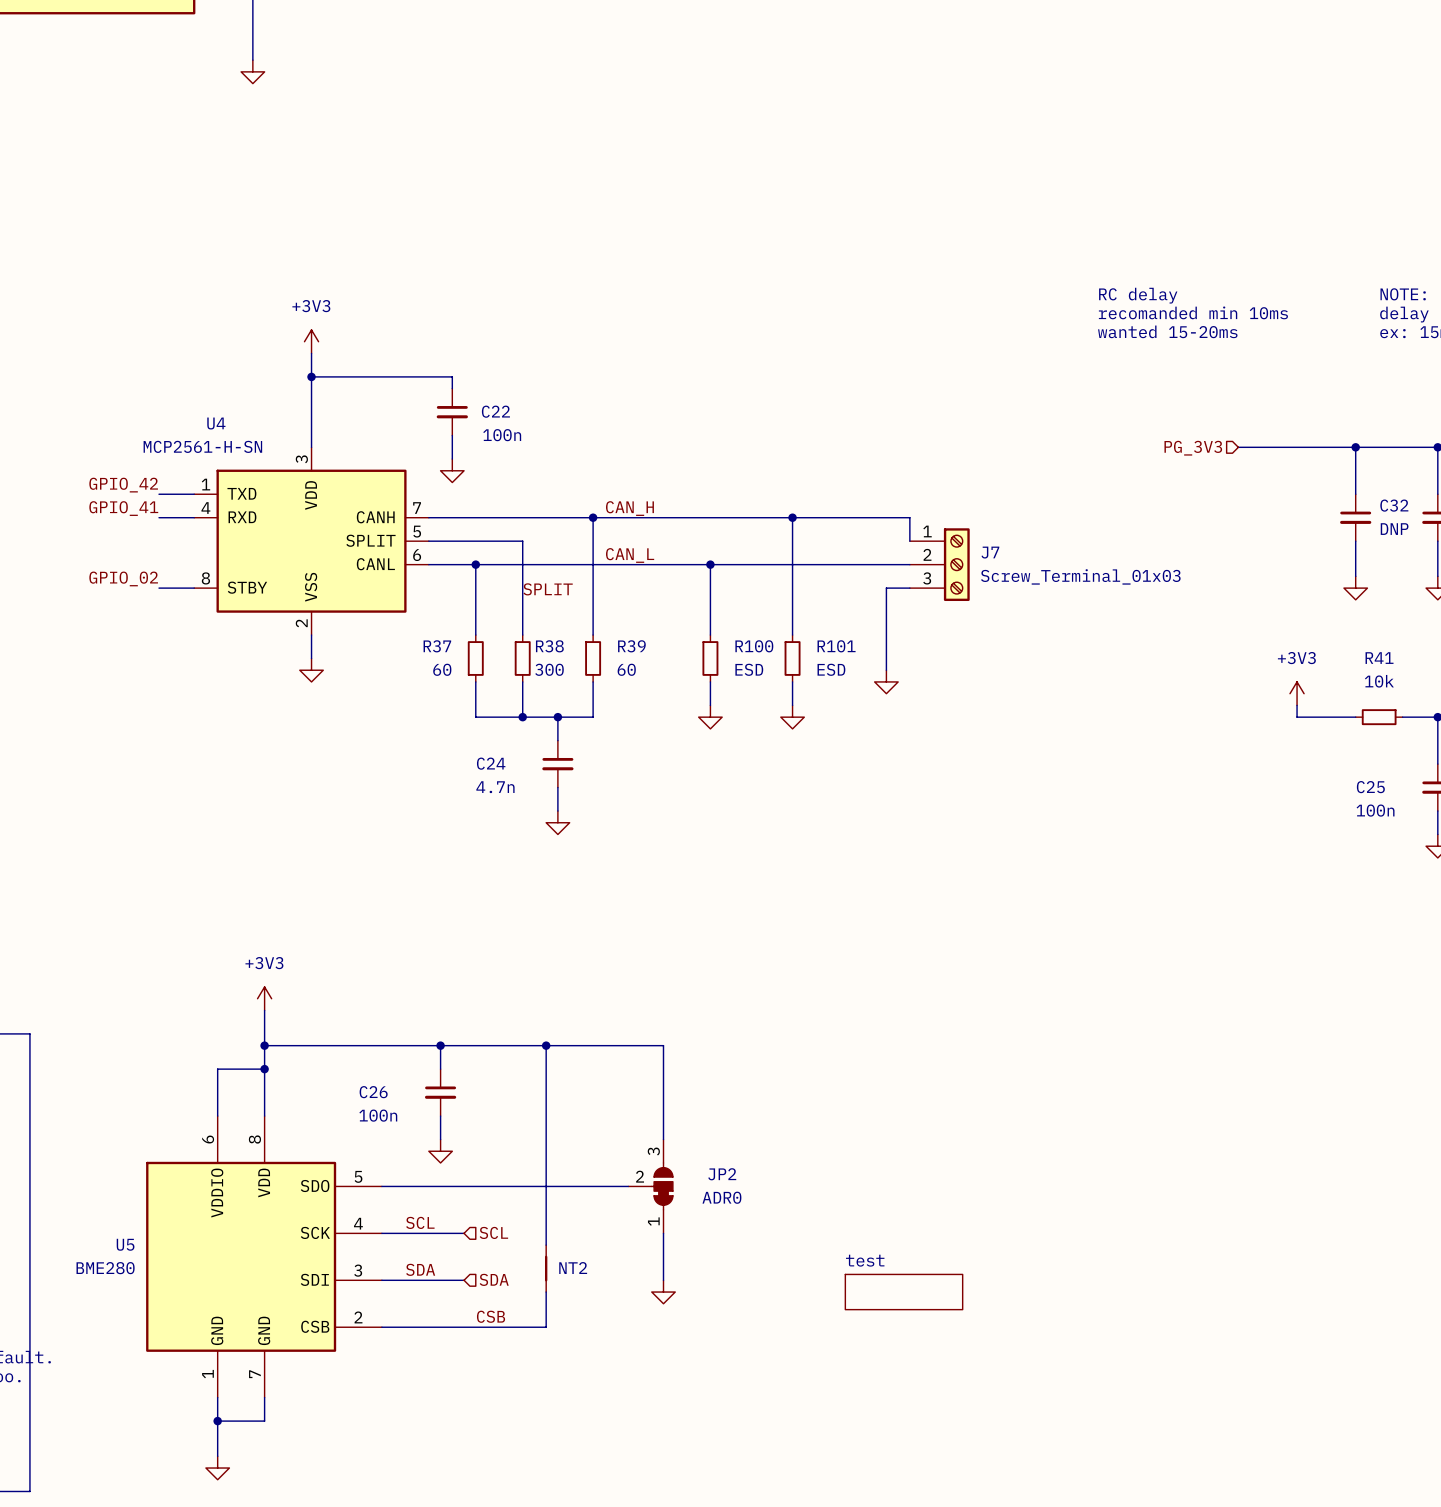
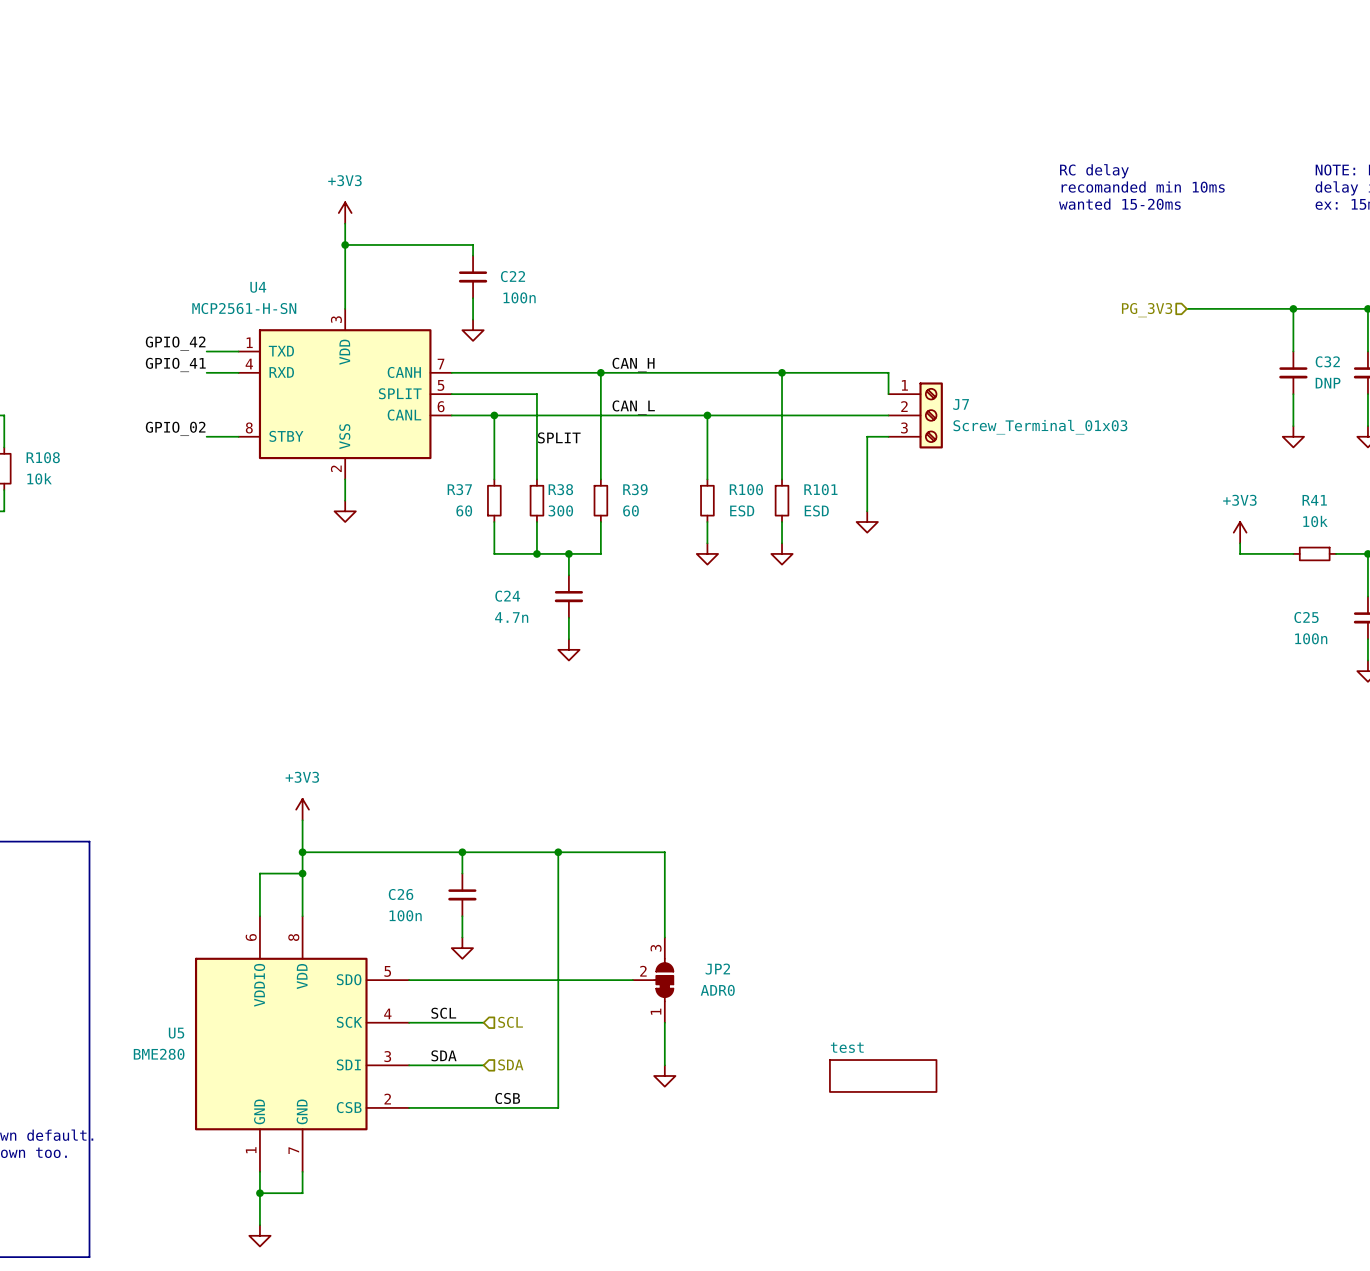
NT2: (546, 1268) -> none

